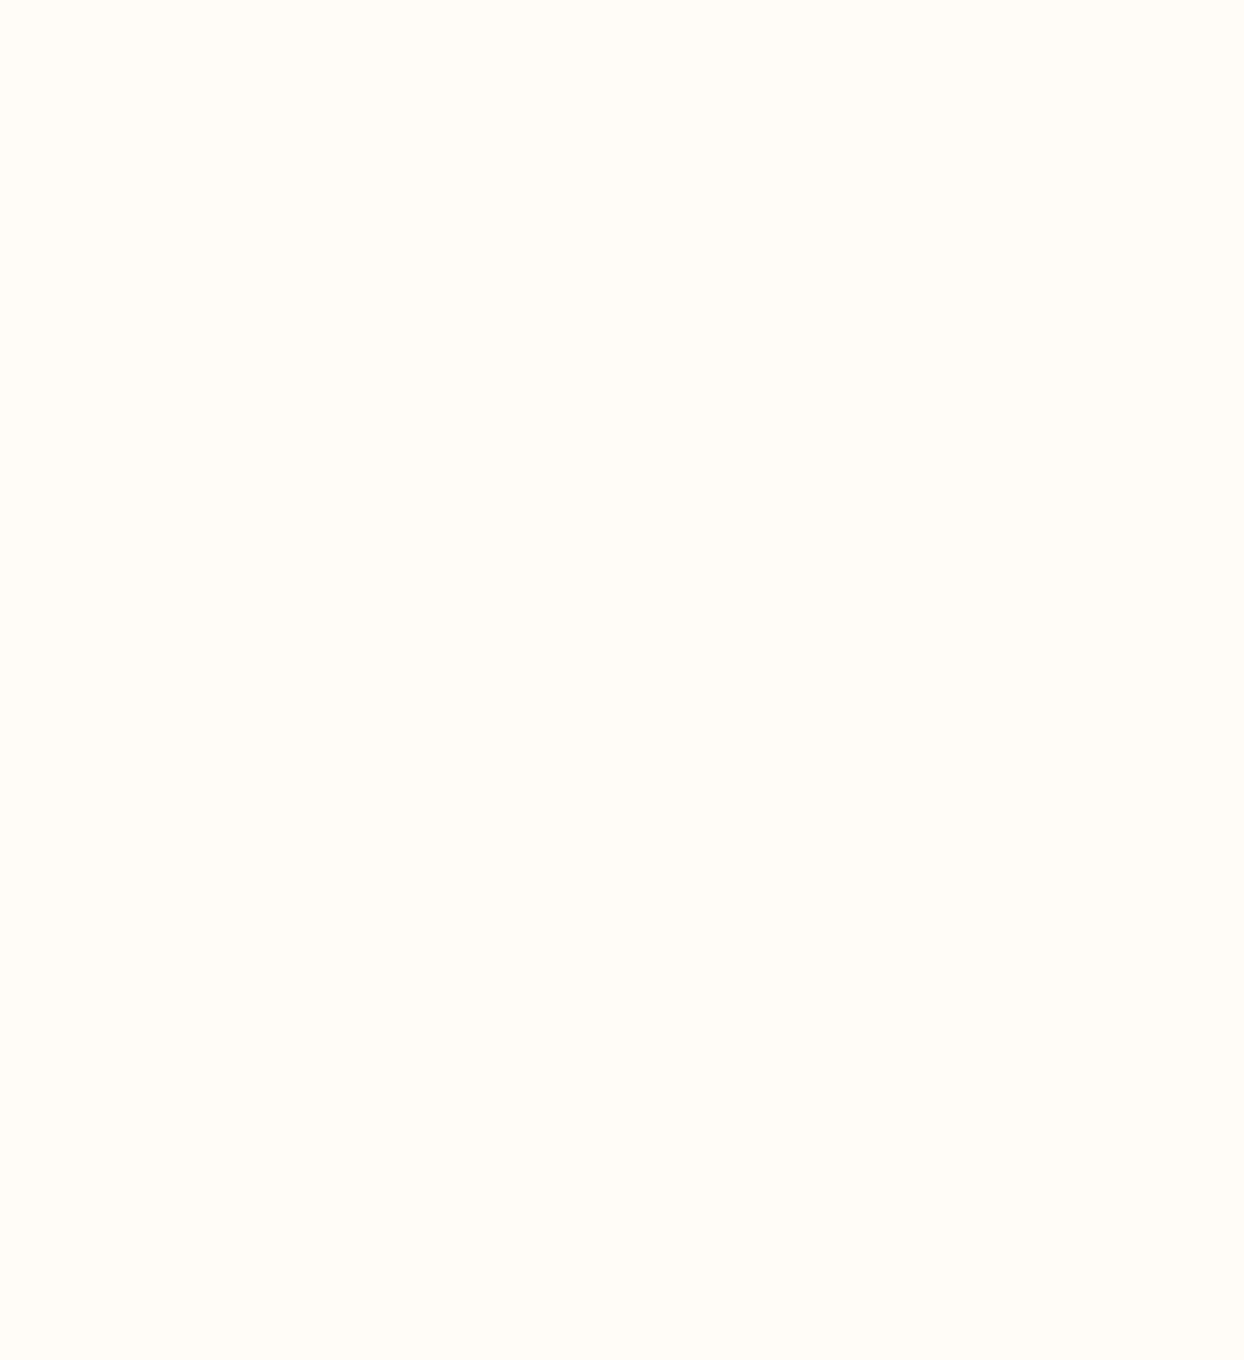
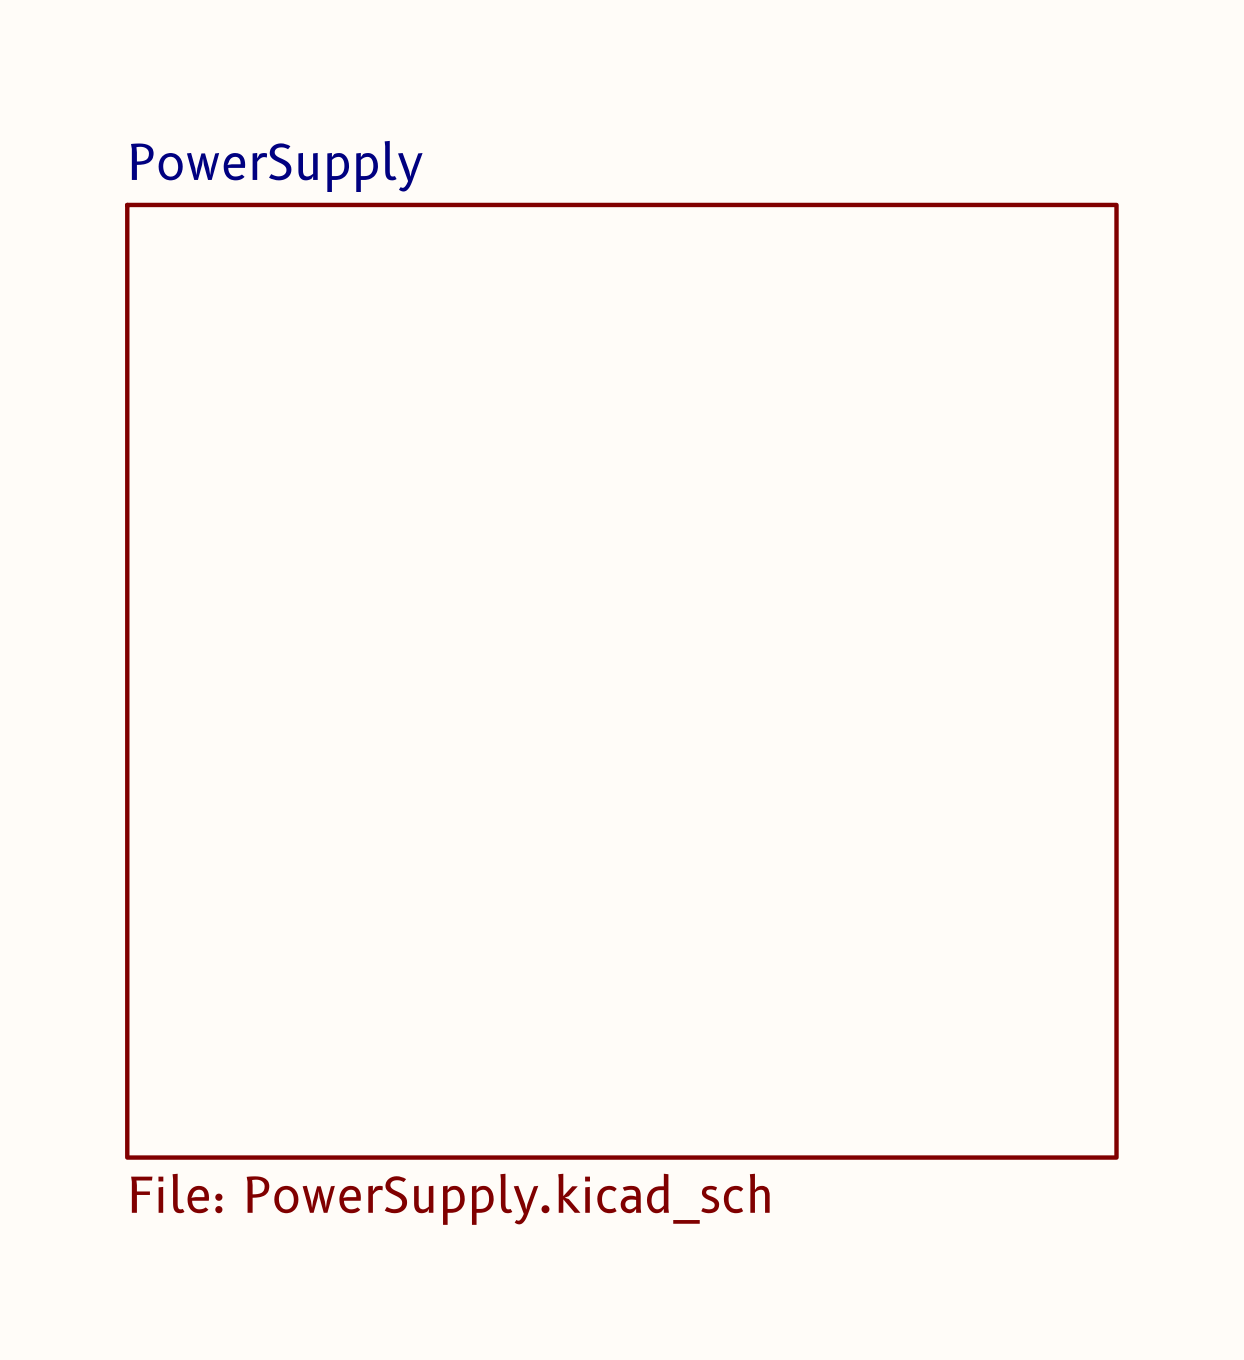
sheet PowerSupply: none -> File: PowerSupply.kicad_sch (621, 681)

